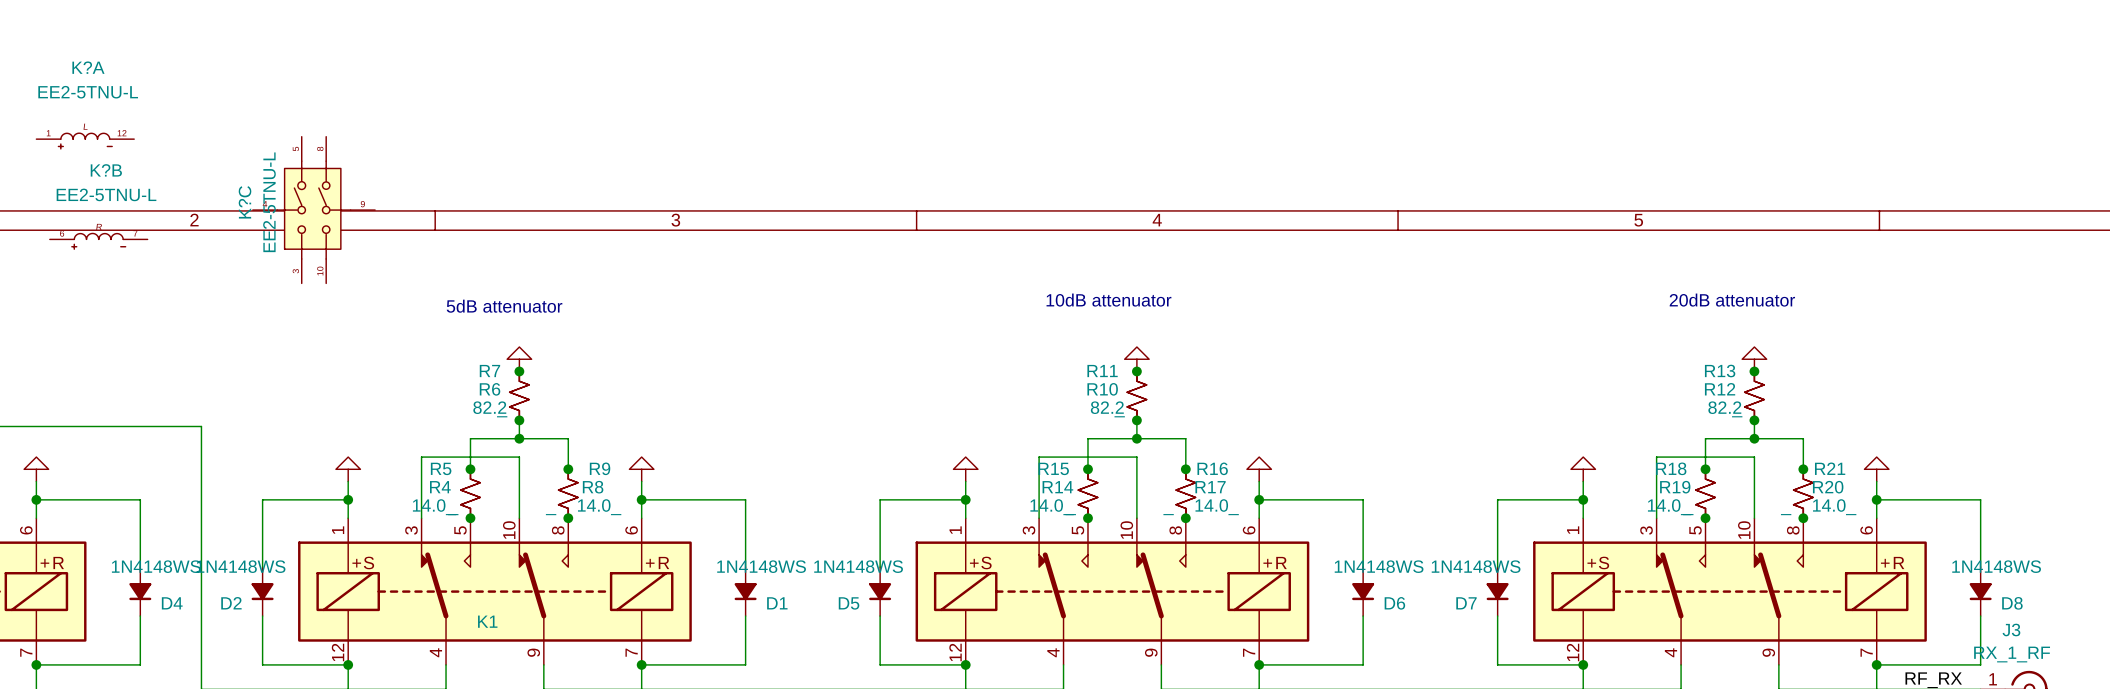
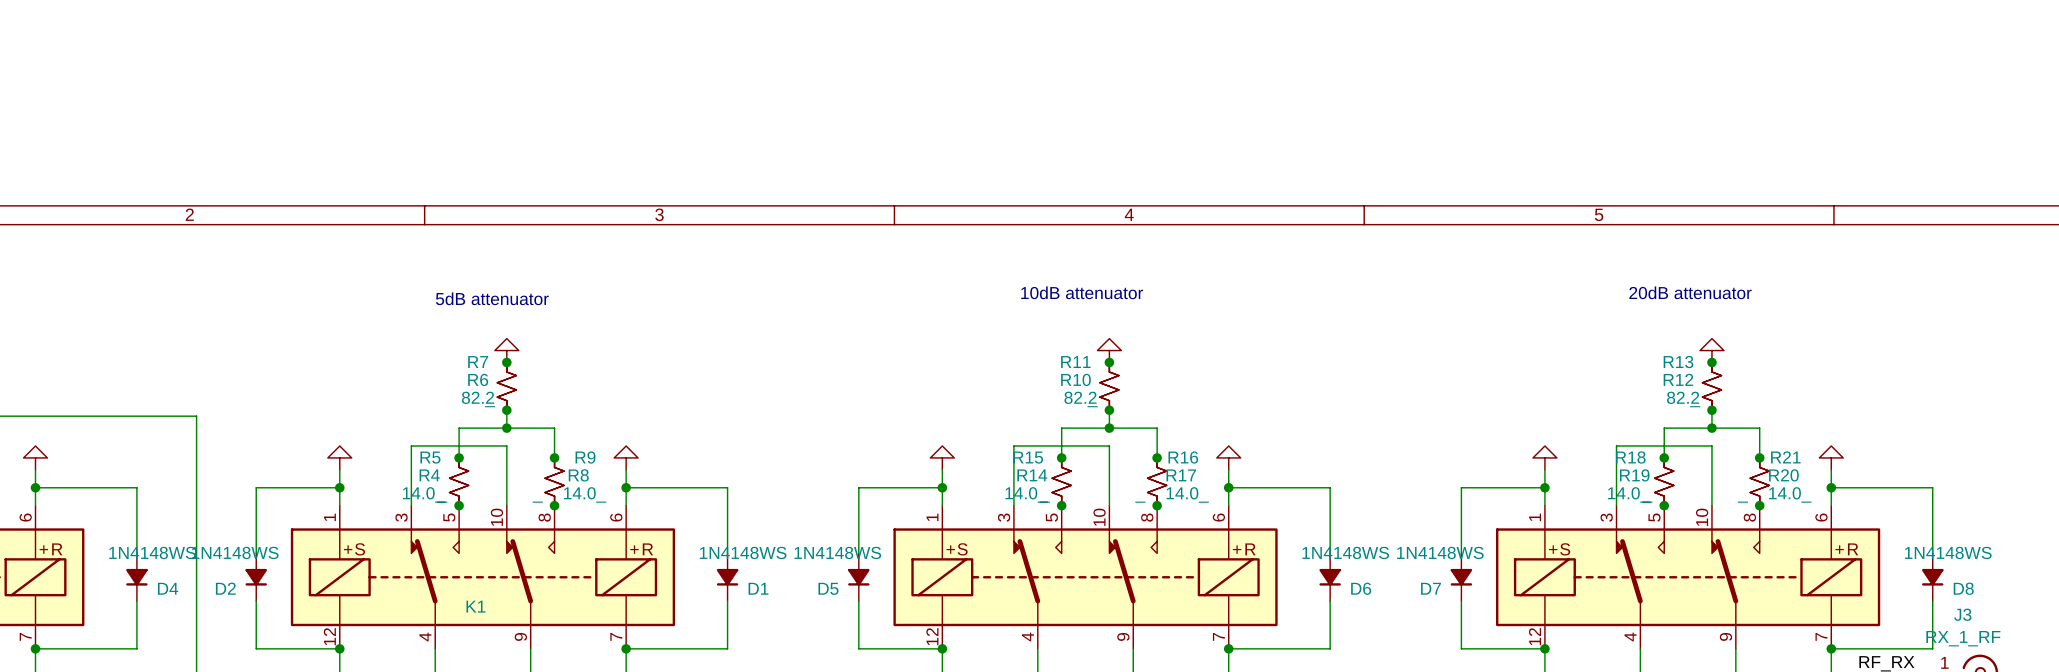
K?A: EE2-5TNU-L (85, 148) -> none
K?C: EE2-5TNU-L (313, 210) -> none
K?B: EE2-5TNU-L (98, 248) -> none

